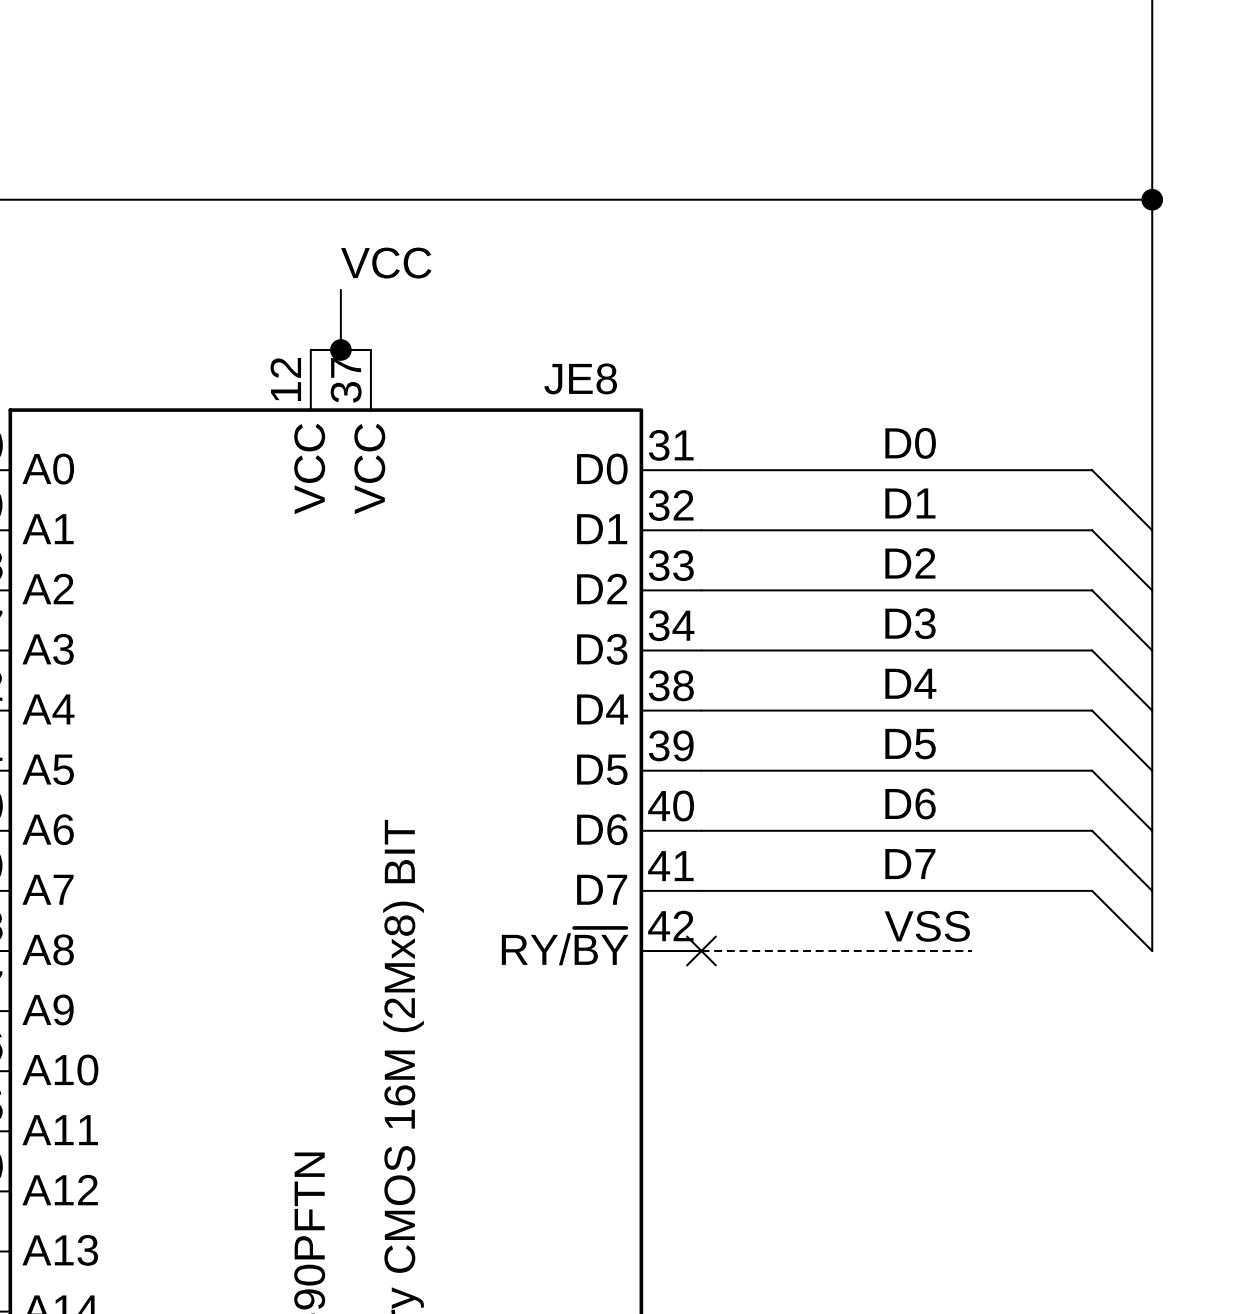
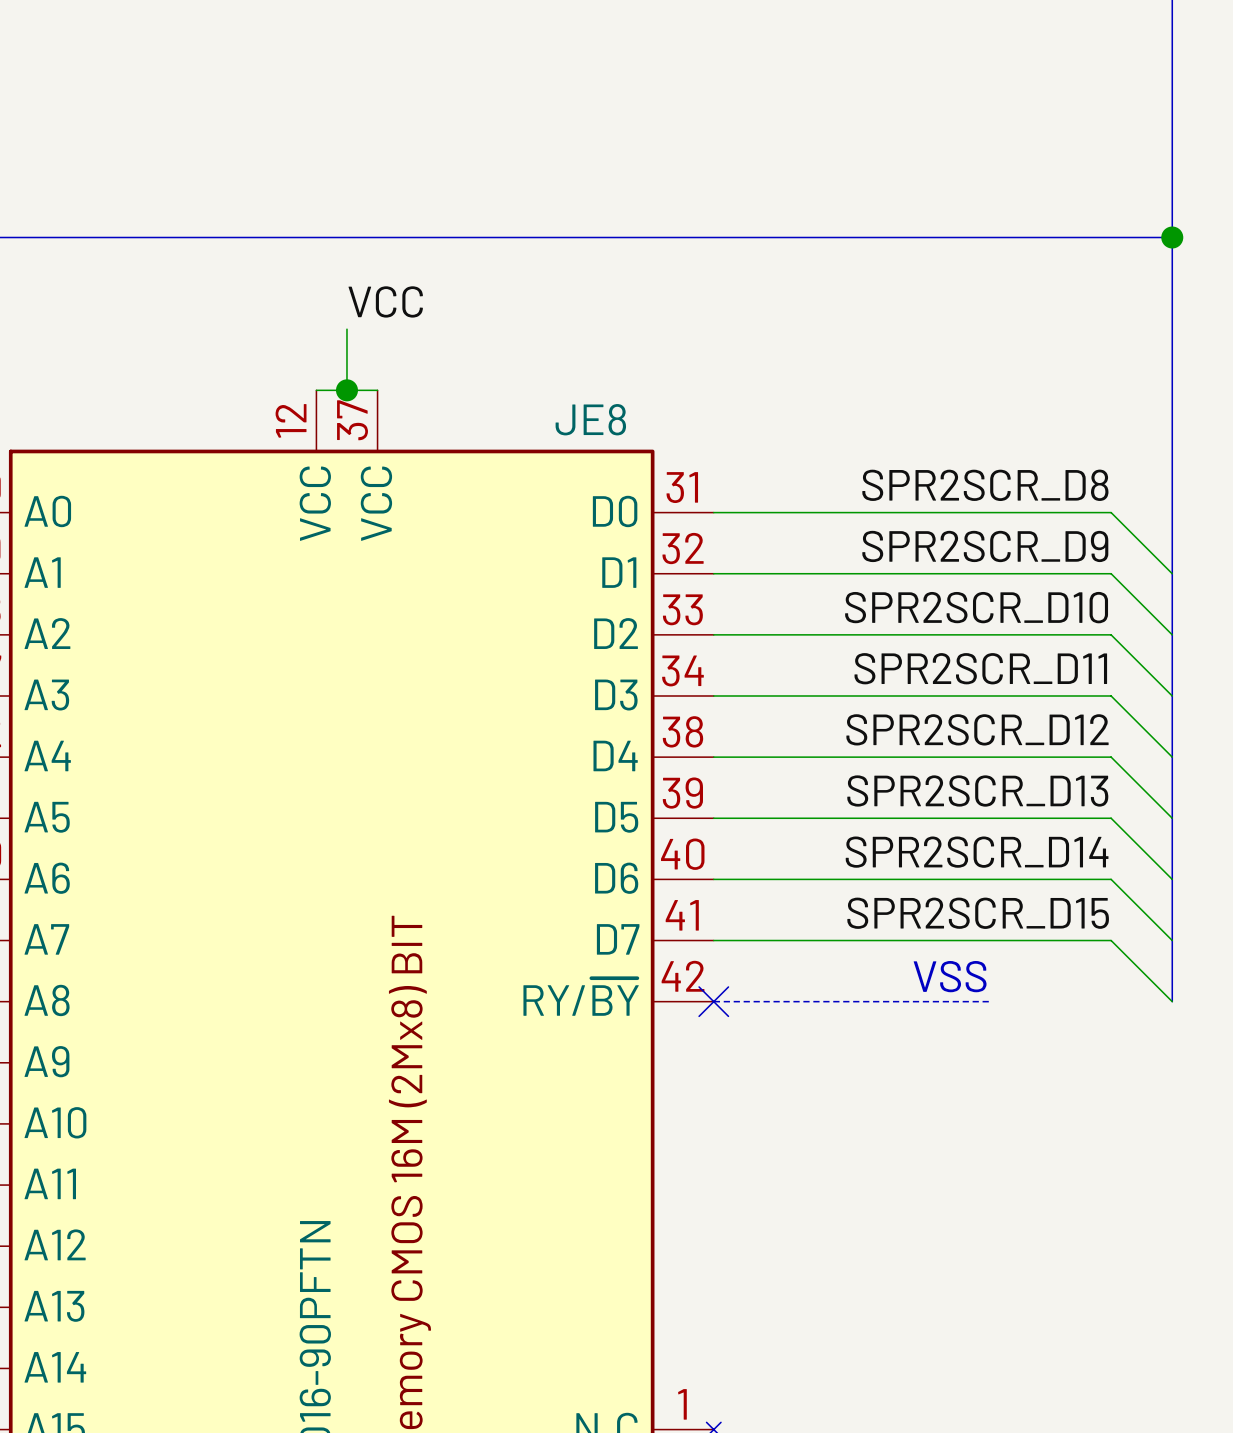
label: D0 (910, 443) -> none
label: none -> SPR2SCR_D8 (985, 485)
label: D1 (910, 503) -> none
label: none -> SPR2SCR_D9 (985, 546)
label: D2 (910, 563) -> none
label: none -> SPR2SCR_D10 (976, 607)
label: D3 (910, 623) -> none
label: none -> SPR2SCR_D11 (980, 668)
label: D4 (910, 683) -> none
label: none -> SPR2SCR_D12 (977, 729)
label: D5 (910, 744) -> none
label: none -> SPR2SCR_D13 (977, 791)
label: D6 (910, 803) -> none
label: none -> SPR2SCR_D14 (977, 852)
label: D7 (910, 864) -> none
label: none -> SPR2SCR_D15 (978, 913)

